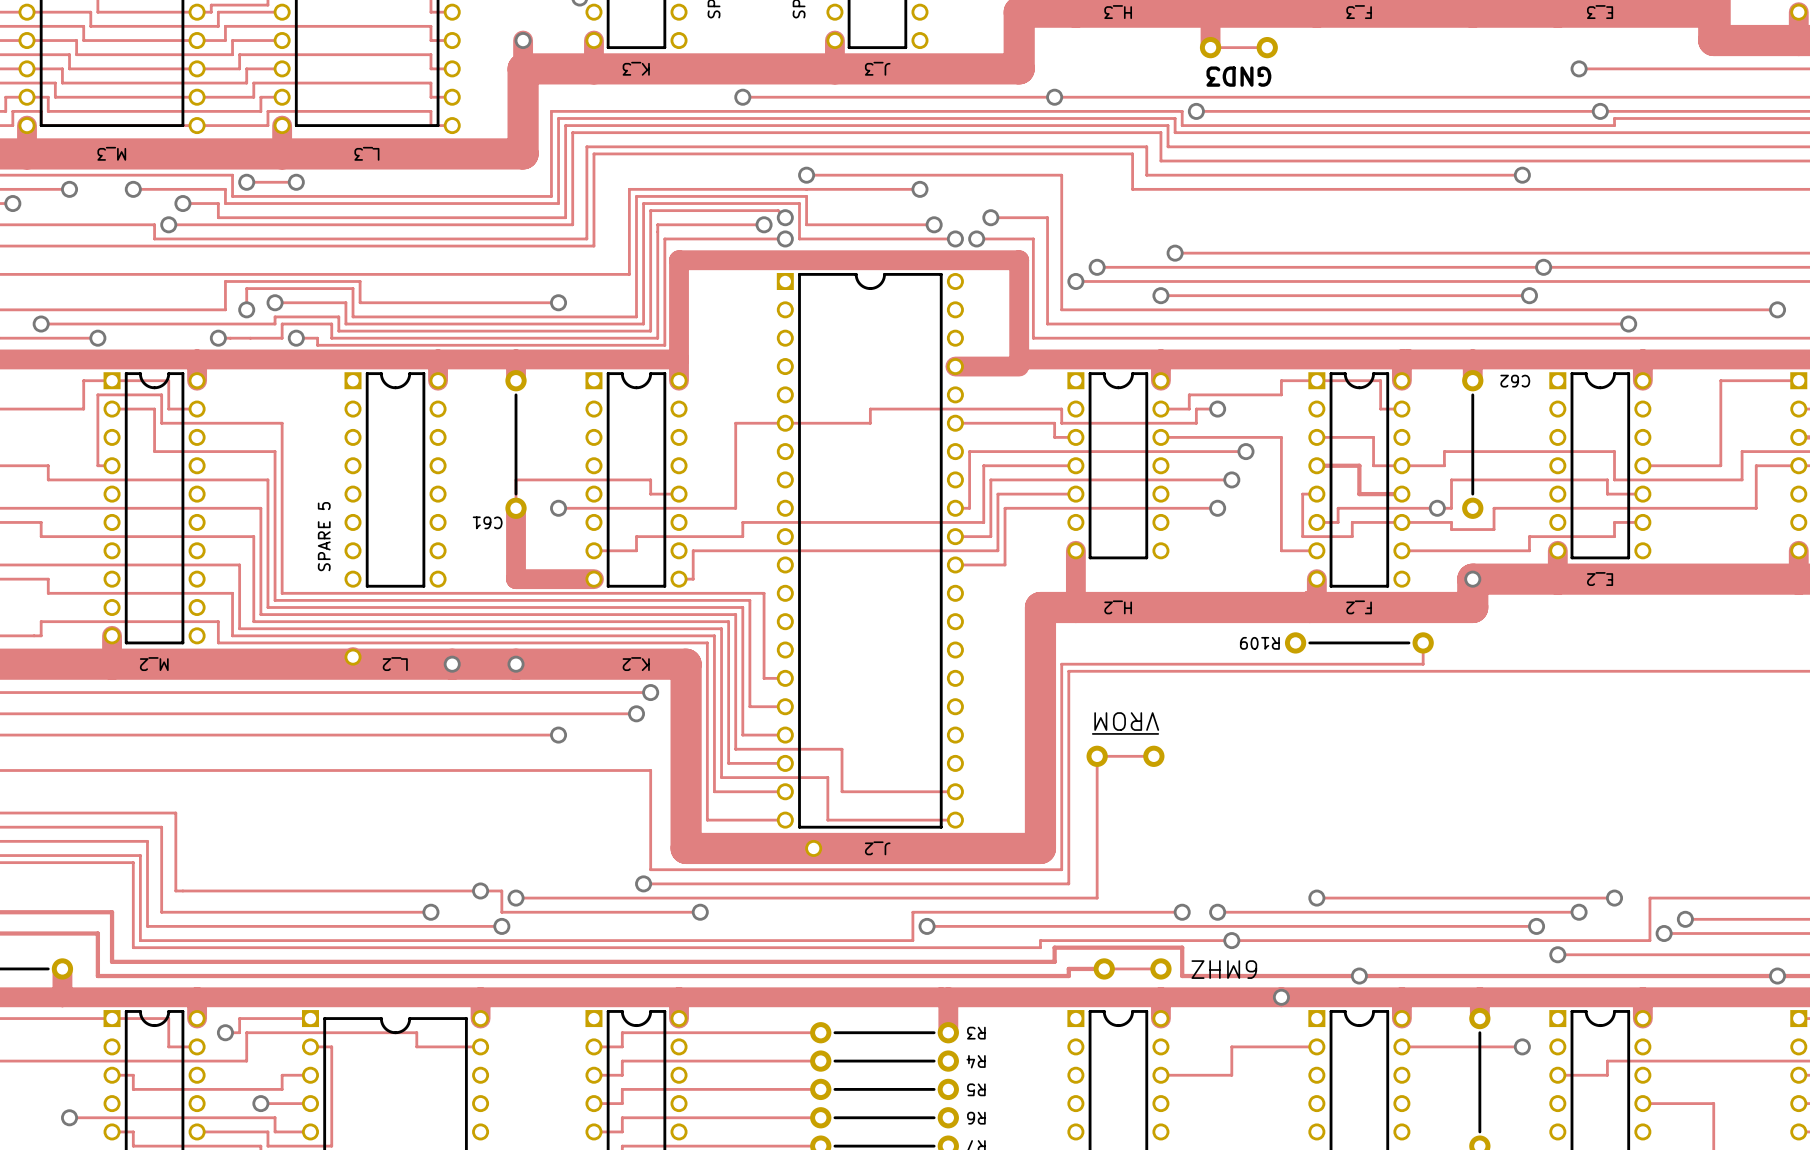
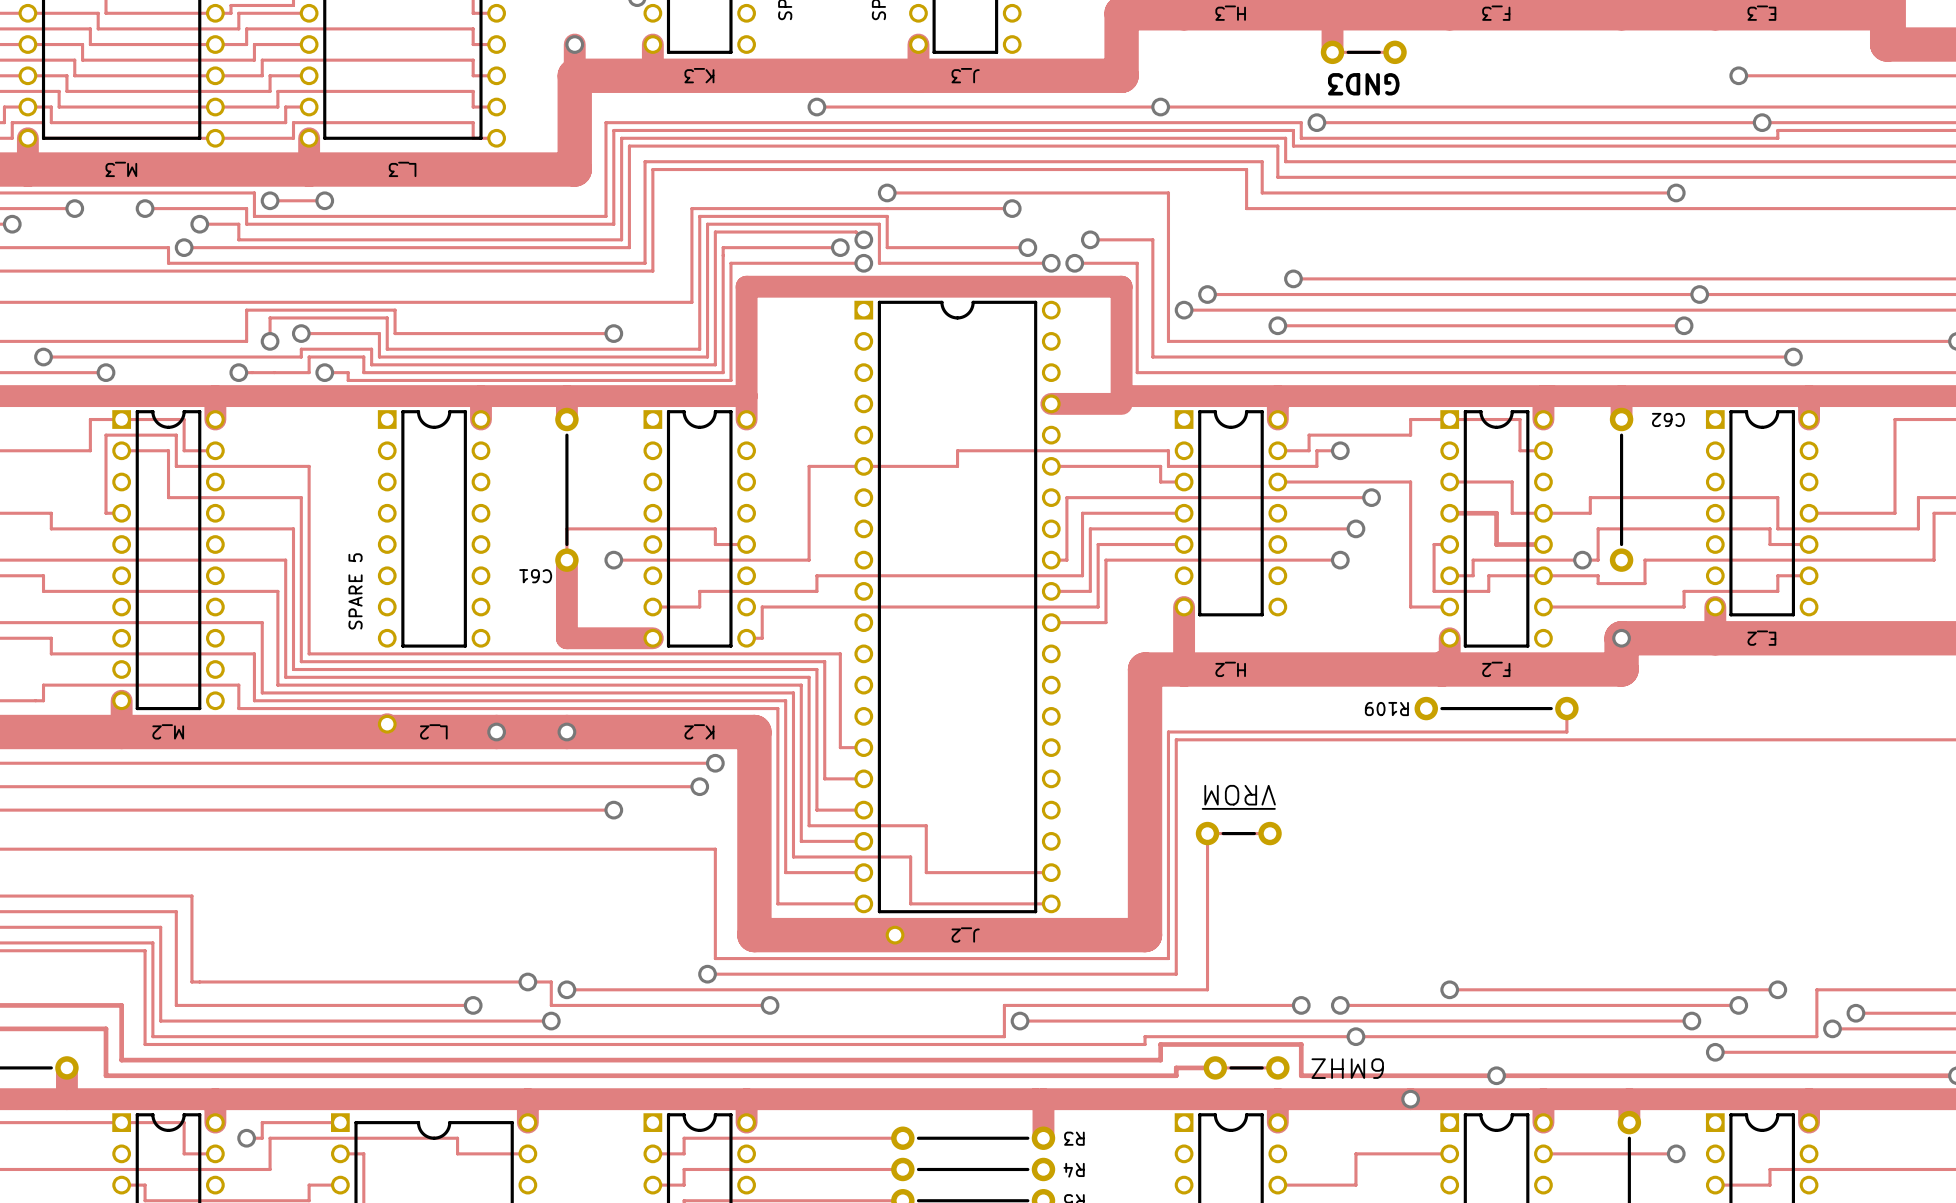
line: none -> (1348, 52) (1379, 52)
line: none -> (1223, 833) (1254, 833)
line: none -> (1230, 1067) (1262, 1067)

